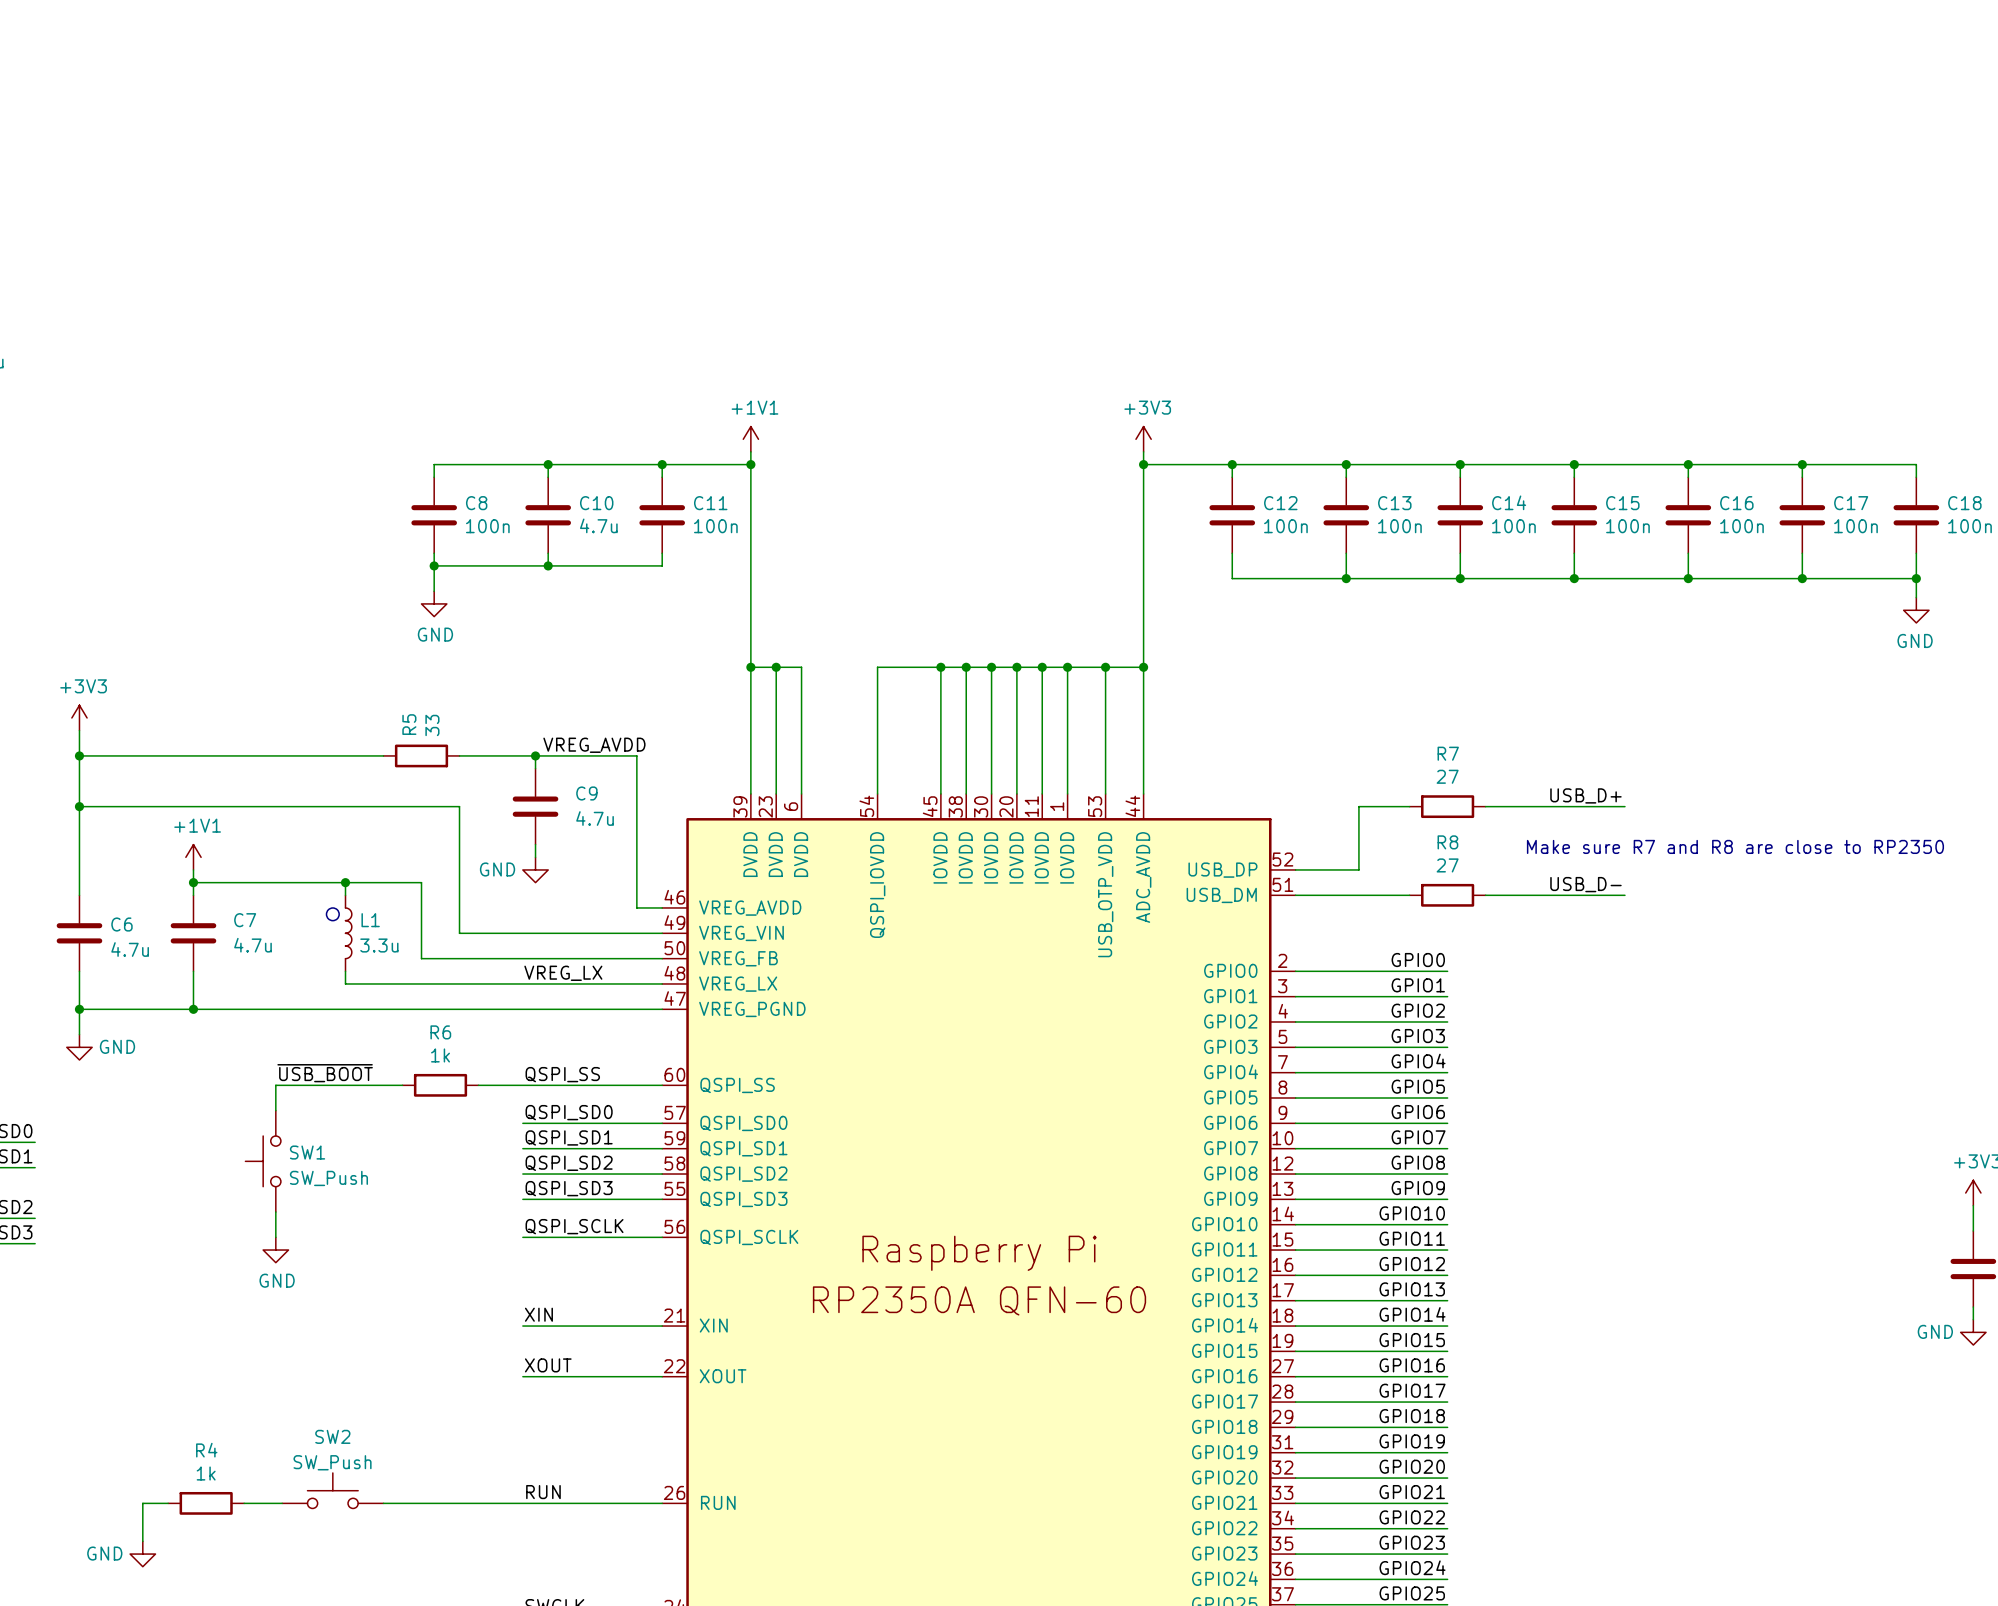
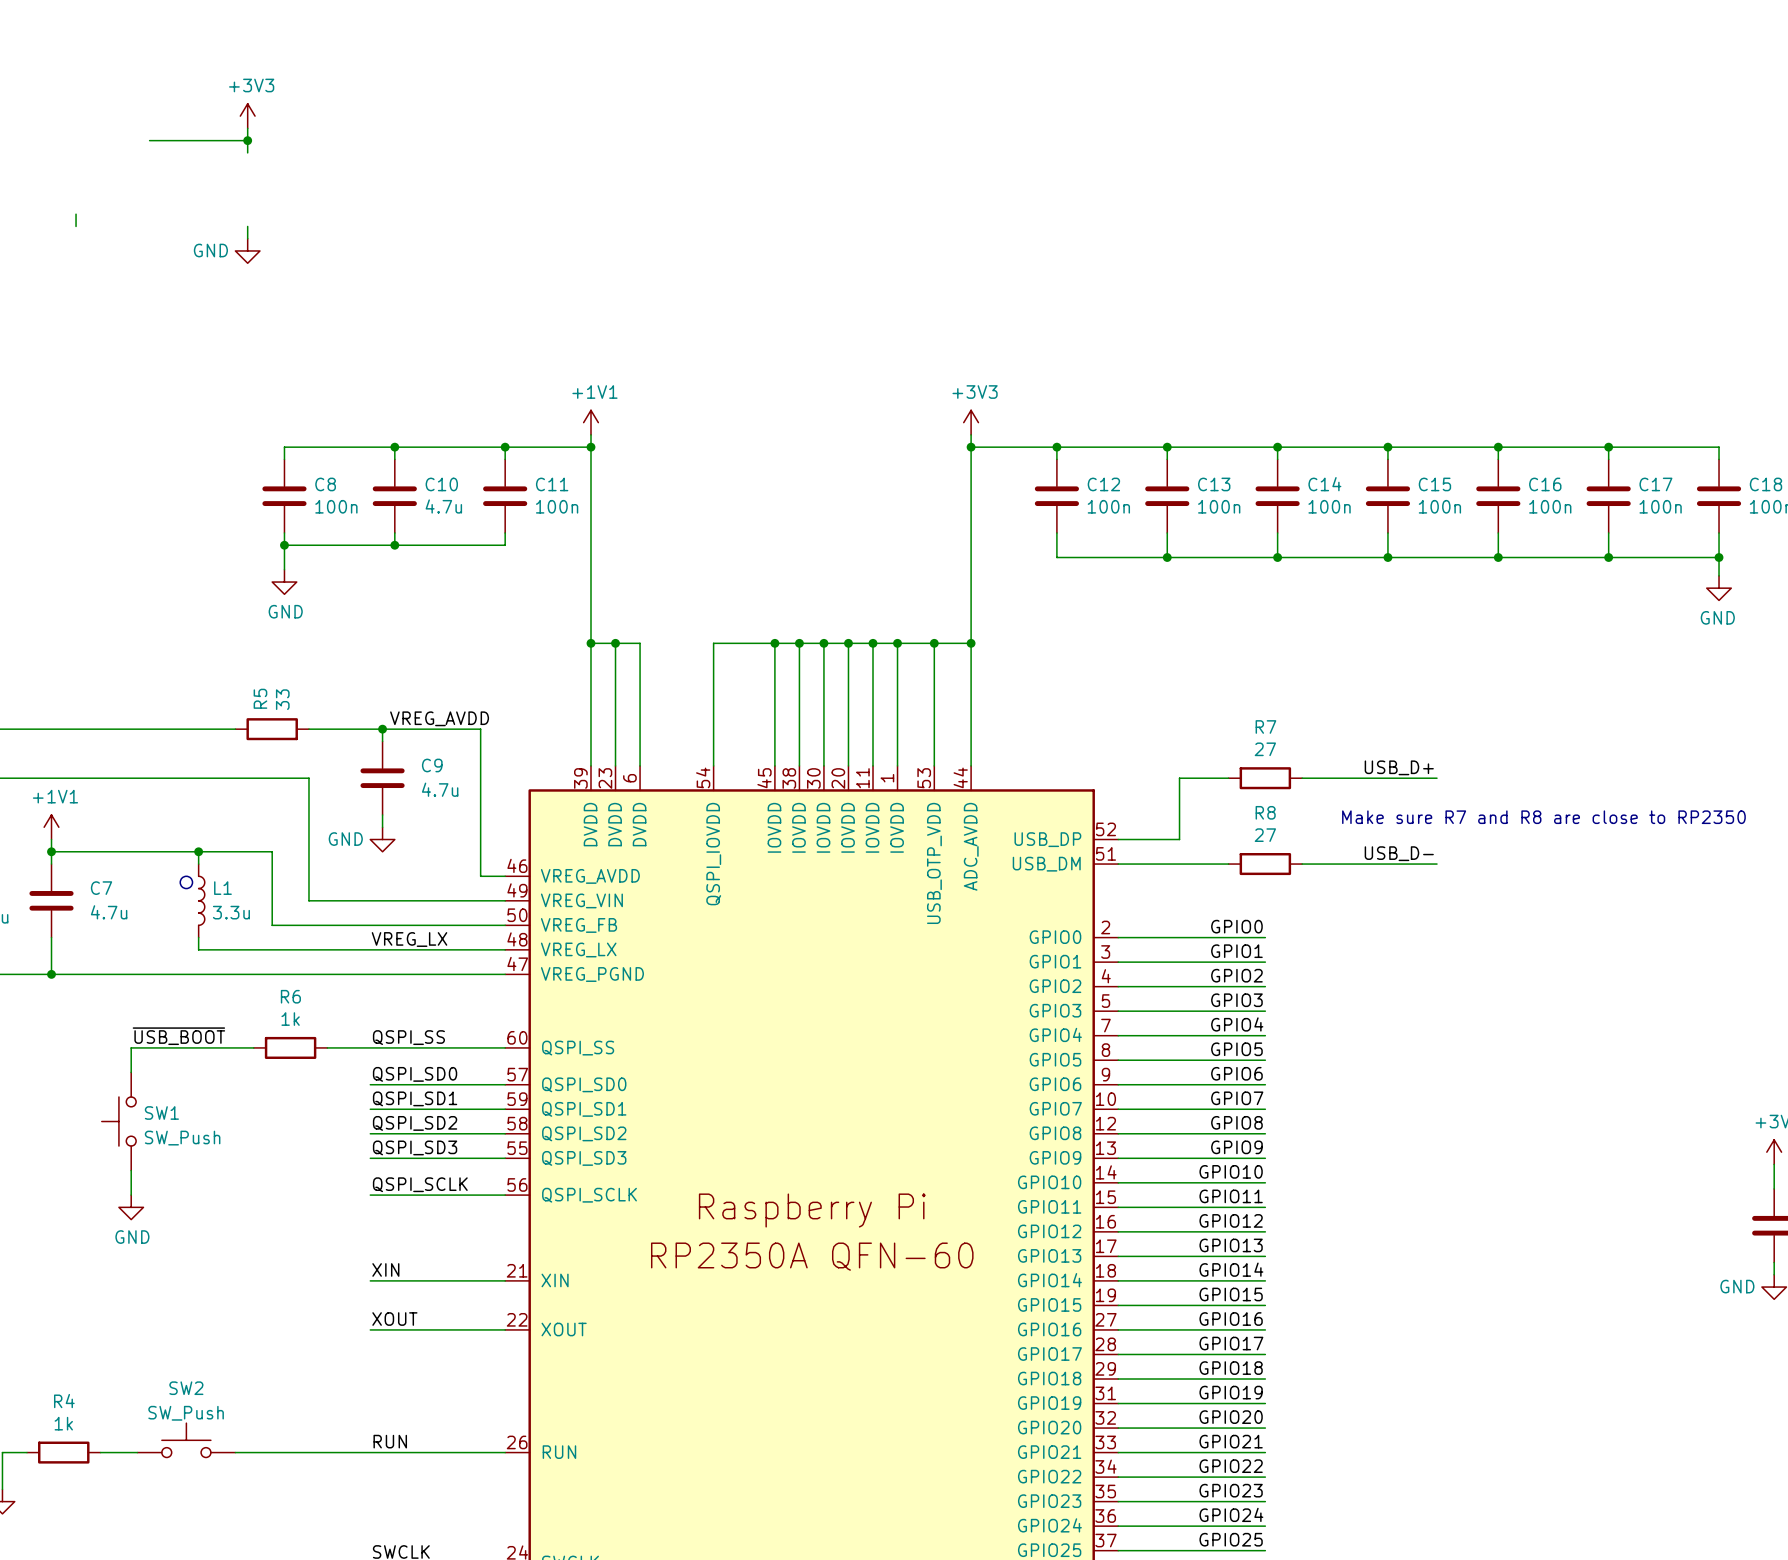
power symbol: none -> +3V3 (247, 116)
wire: none -> (247, 128) (247, 152)
wire: none -> (149, 140) (247, 140)
junction: none -> (247, 140)
wire: none -> (76, 214) (76, 226)
wire: none -> (247, 226) (247, 238)
power symbol: none -> GND (247, 250)

